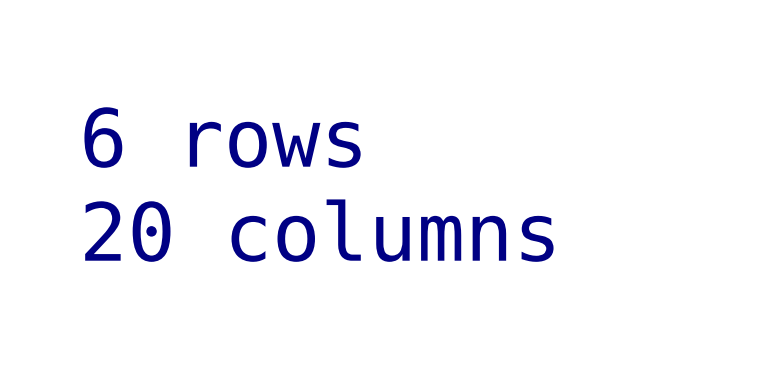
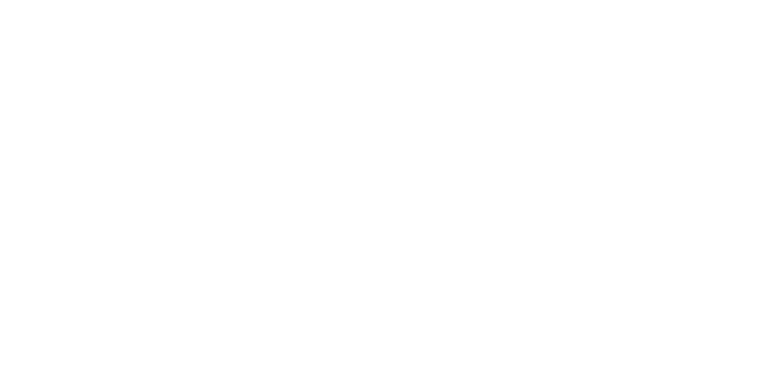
text: 6 rows (222, 137) -> none
text: 20 columns (319, 230) -> none

